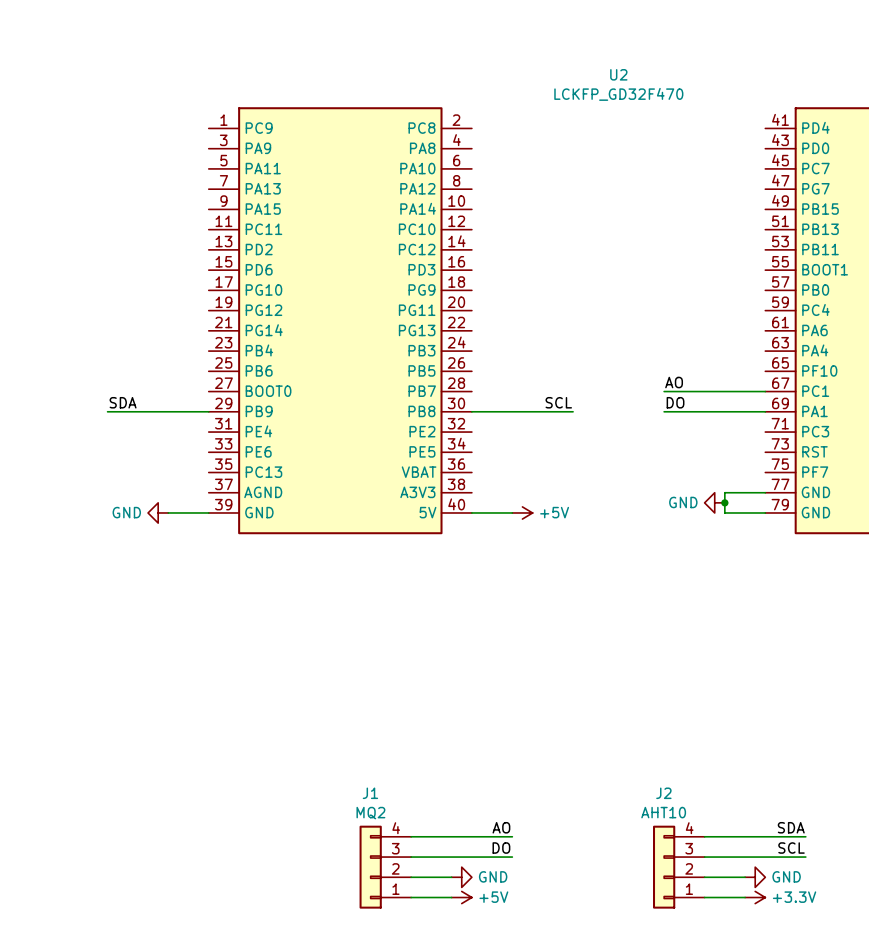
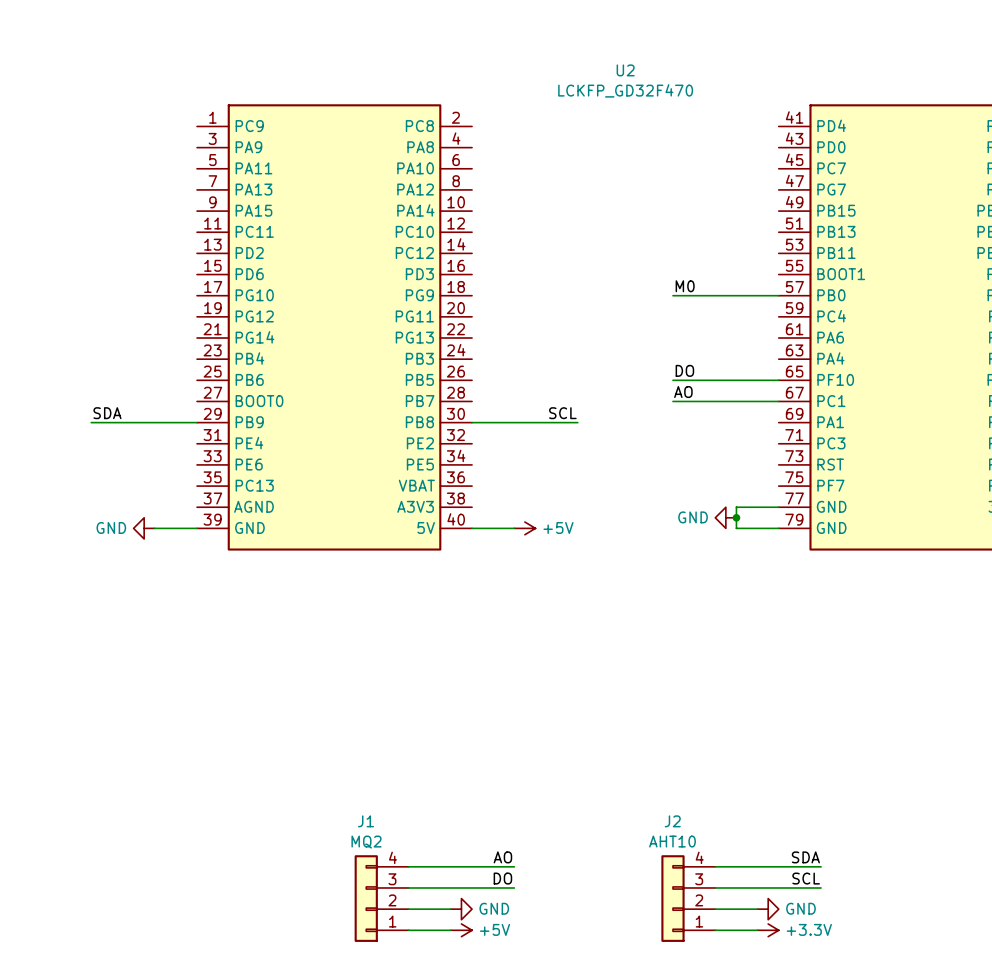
label: none -> M0 (685, 286)
wire: none -> (672, 295) (778, 295)
label position: DO (675, 402) -> DO (684, 370)
wire: (664, 411) (765, 411) -> (672, 380) (778, 380)

